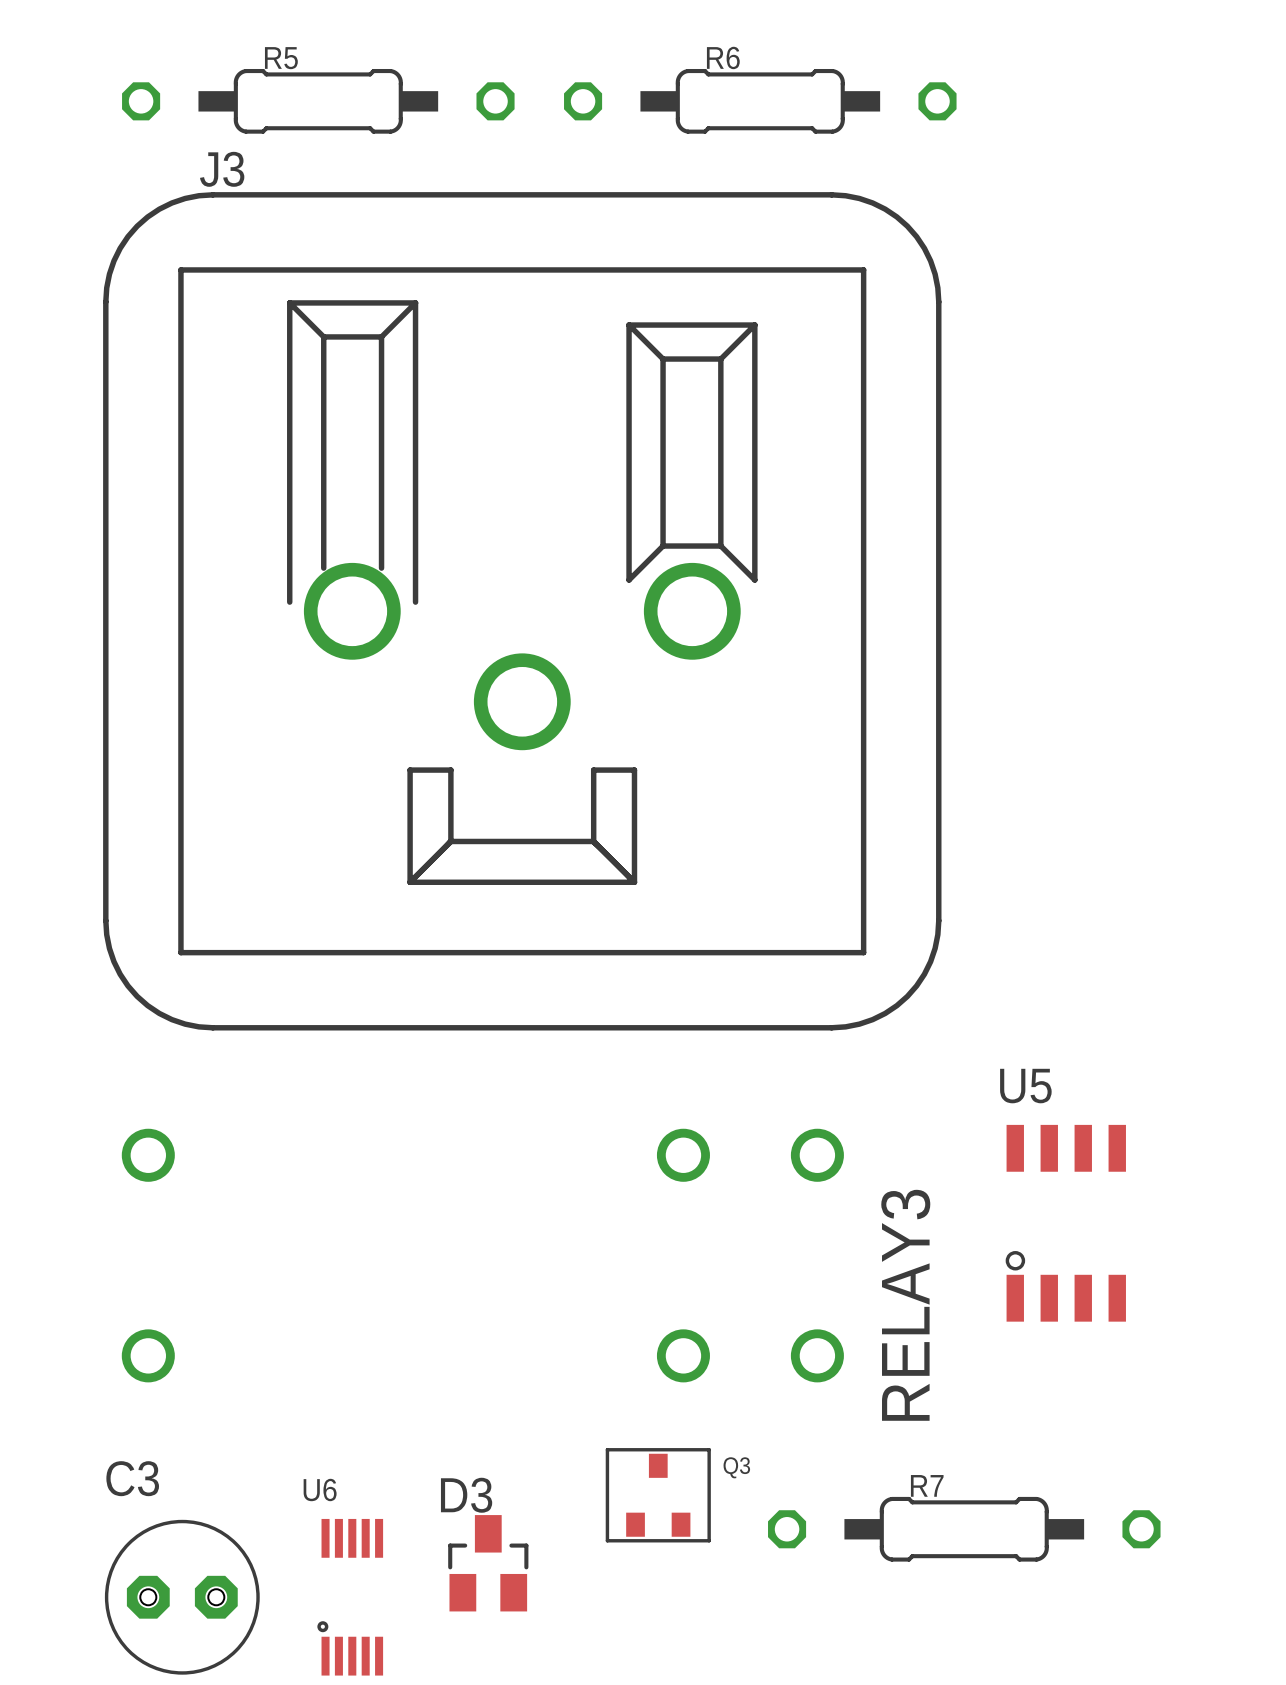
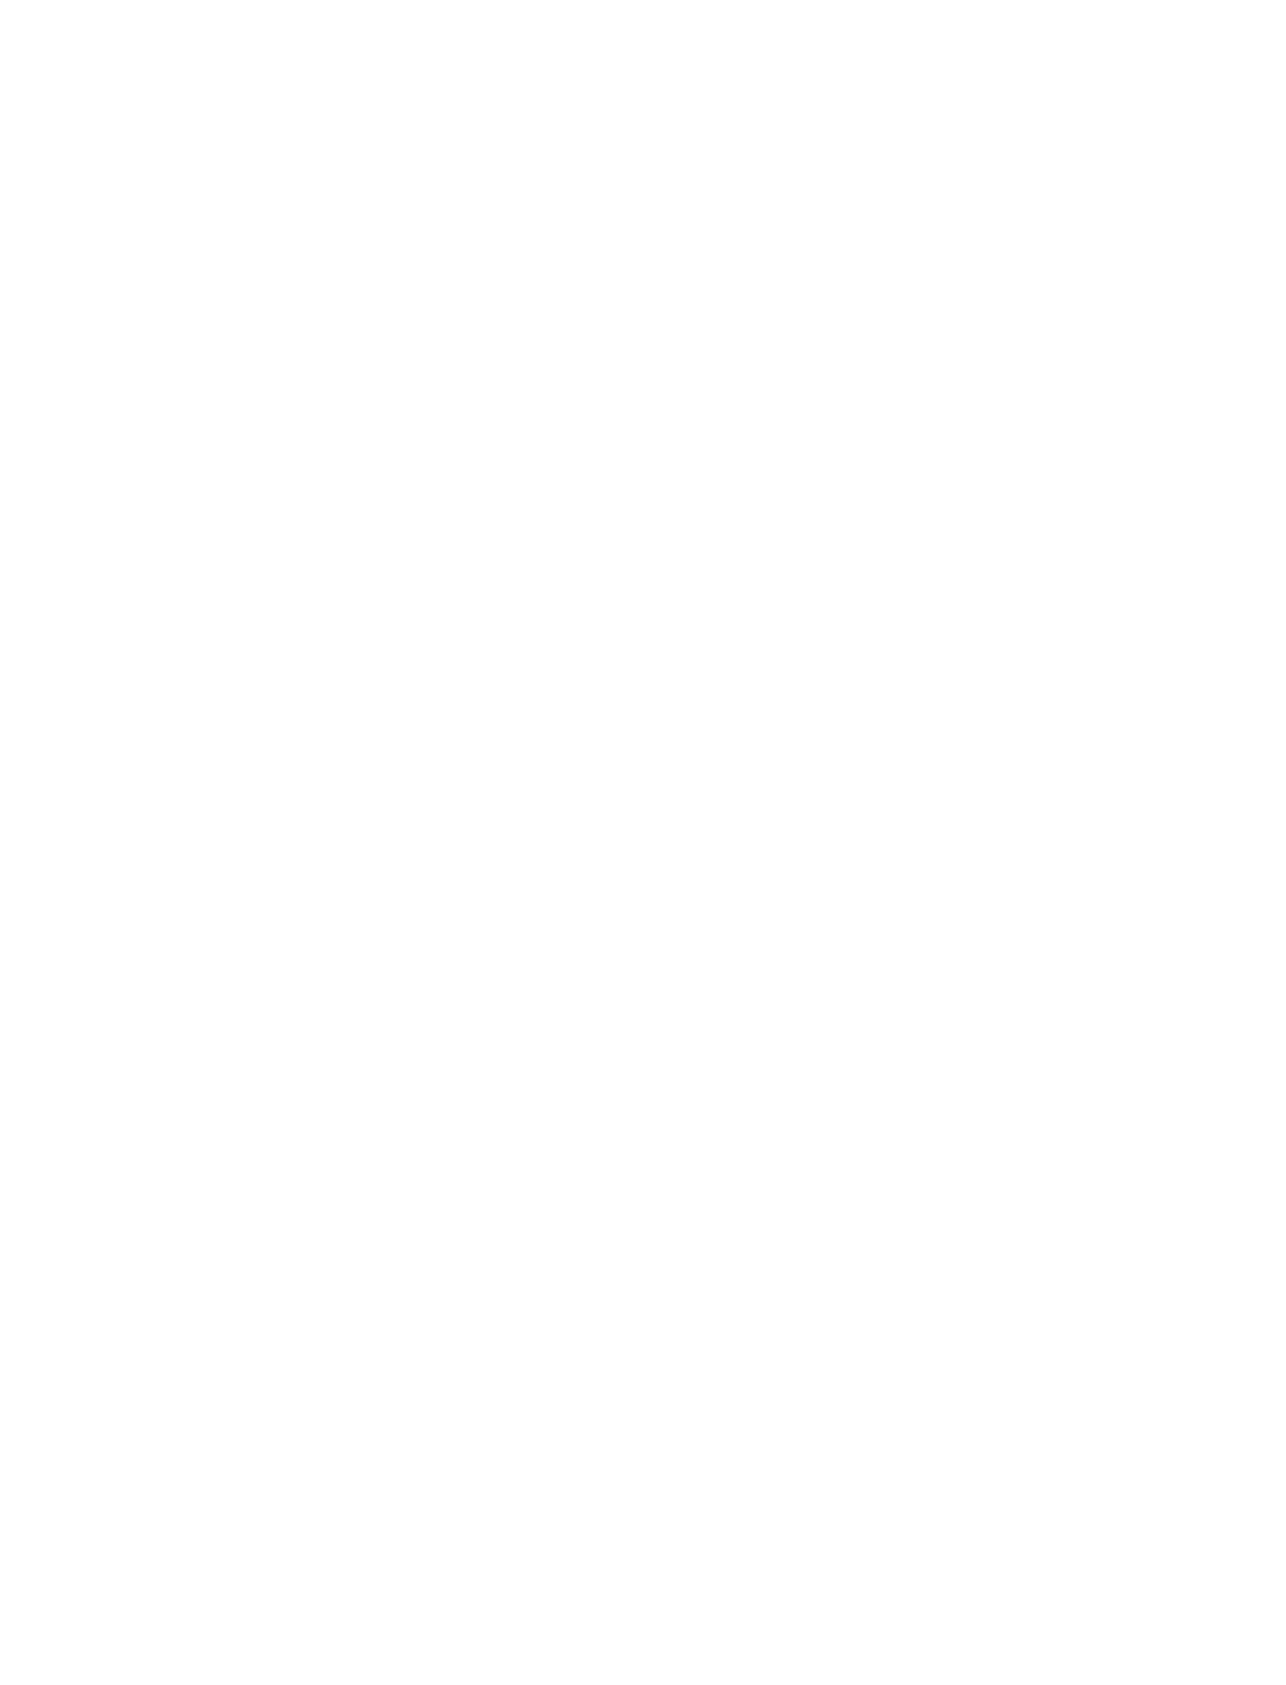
R5: (318, 101) -> none
R6: (760, 101) -> none
J3: (522, 611) -> none
U5: (1065, 1223) -> none
RELAY3: (482, 1255) -> none
Q3: (658, 1495) -> none
R7: (964, 1529) -> none
D3: (488, 1563) -> none
C3: (182, 1597) -> none
U6: (350, 1597) -> none

